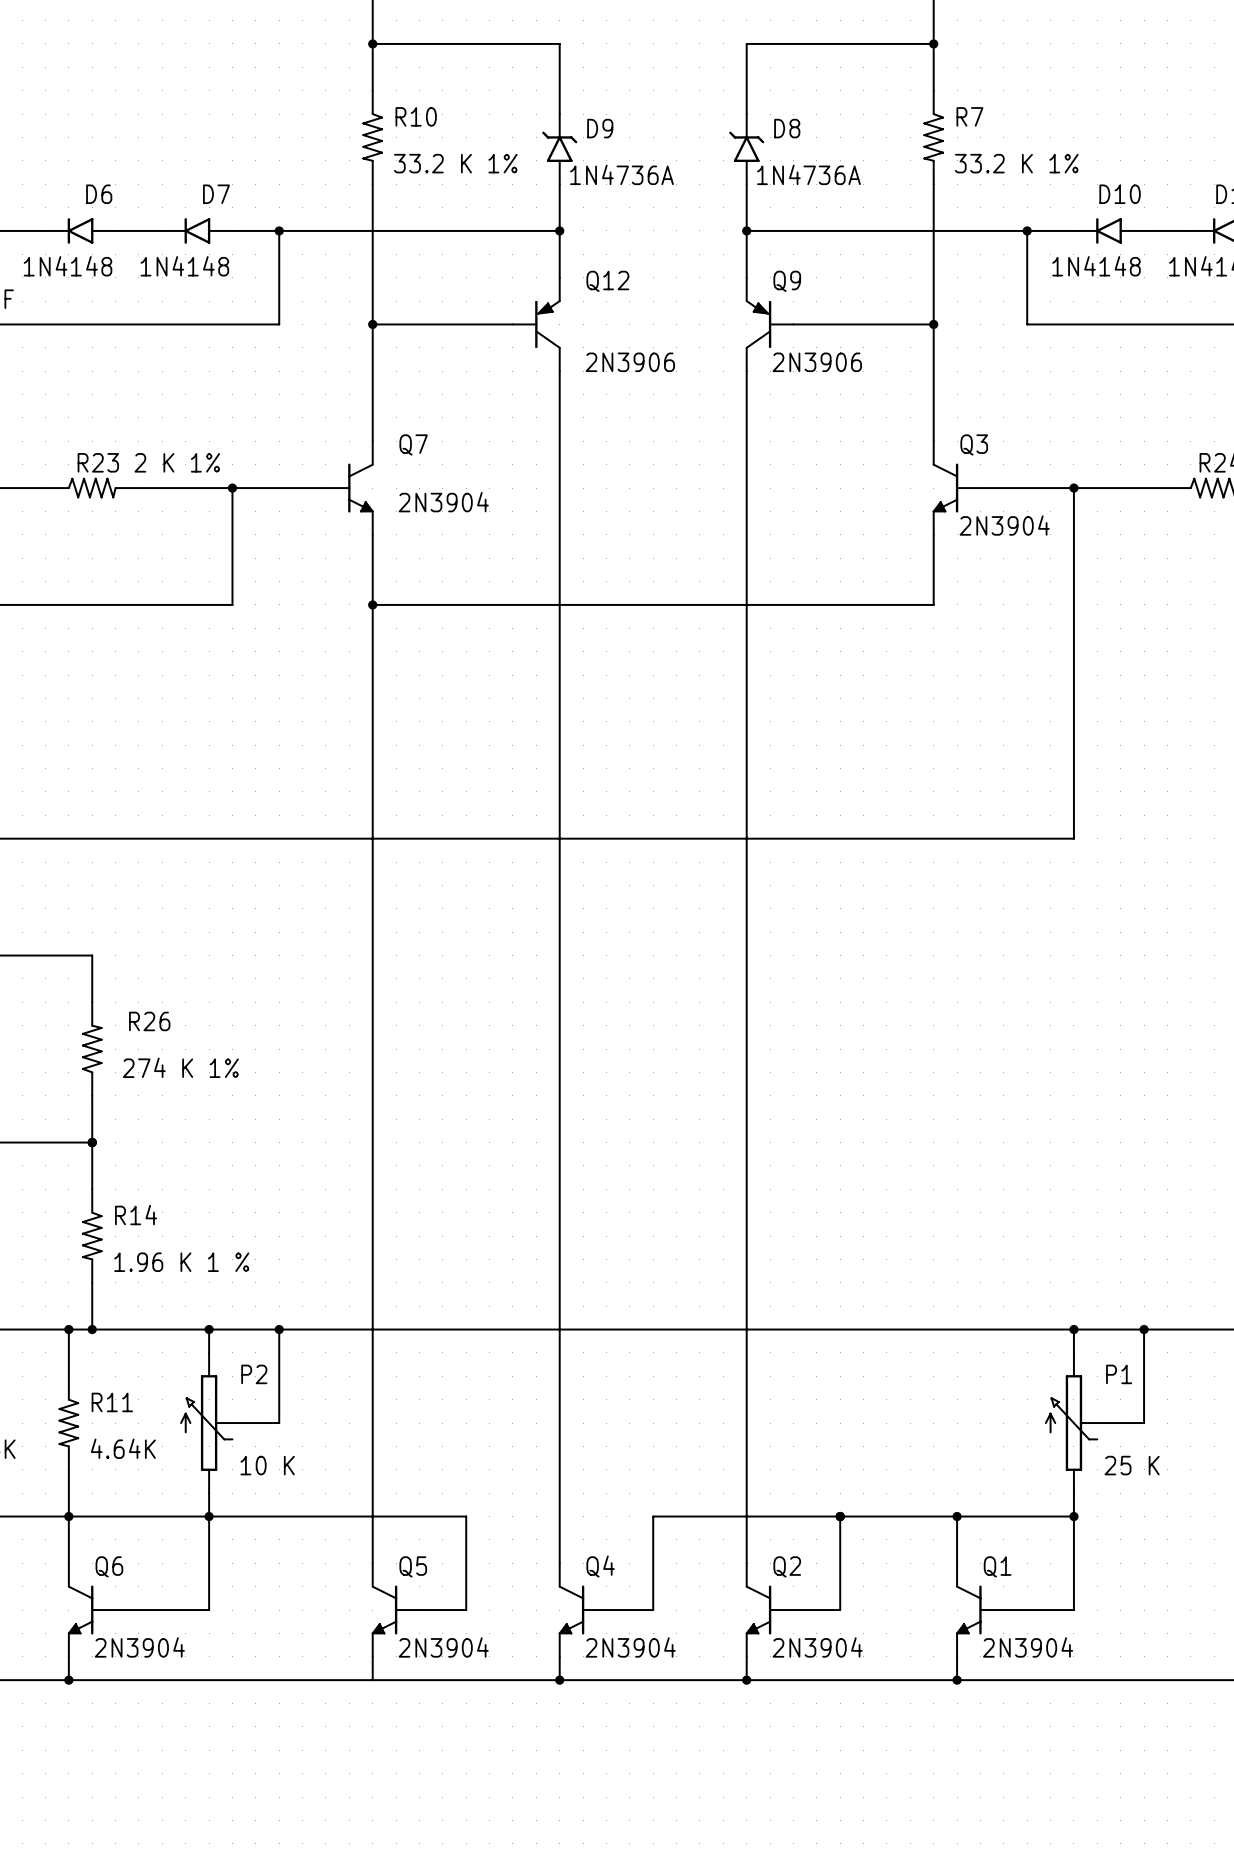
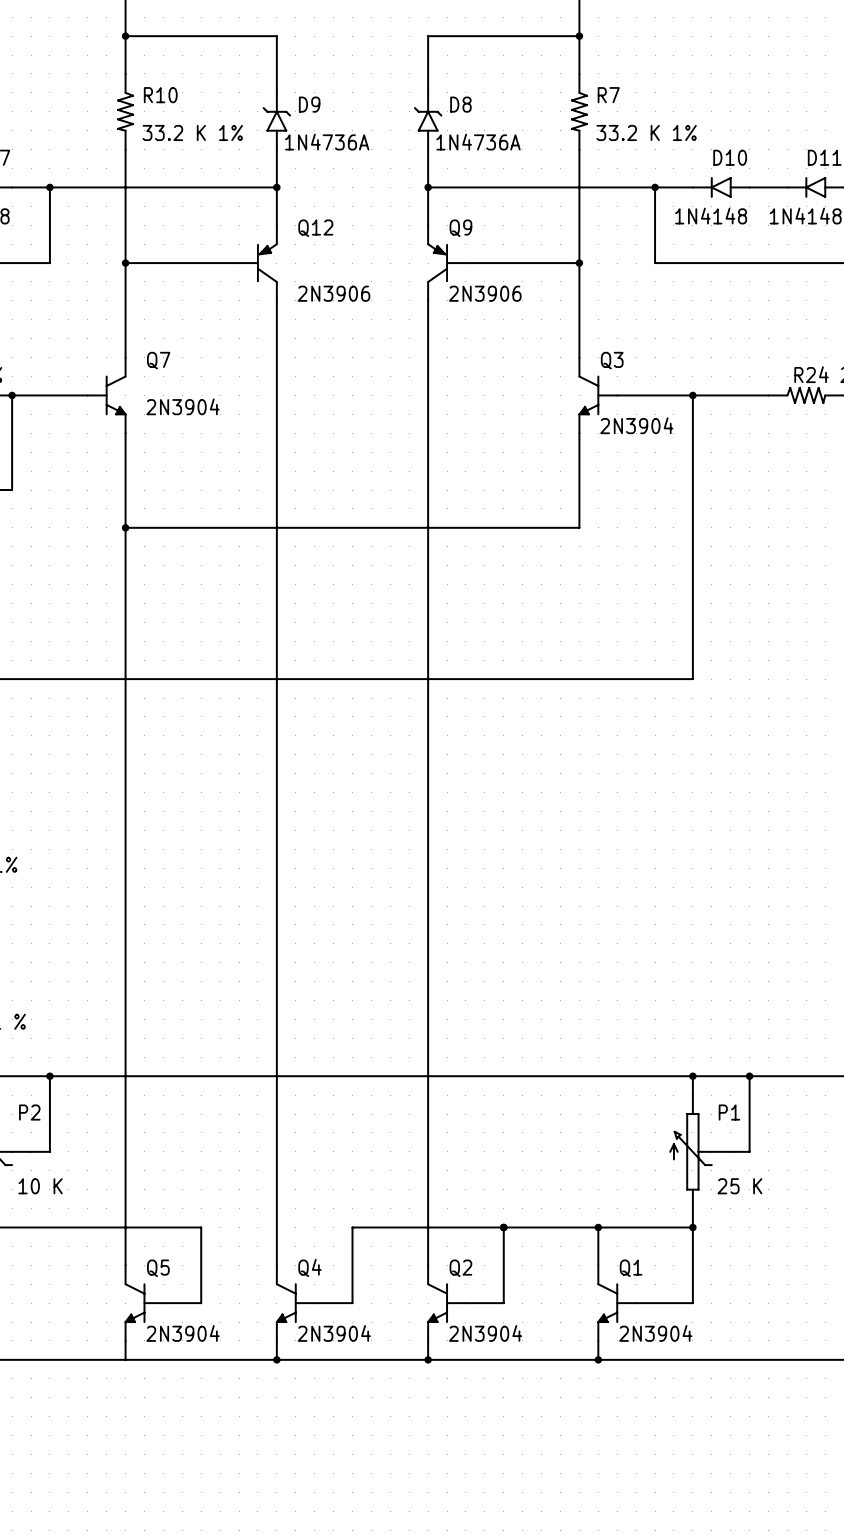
wire: (372, 604) (933, 604) -> (125, 527) (579, 527) (579, 490)
junction position: (372, 604) -> (125, 527)

